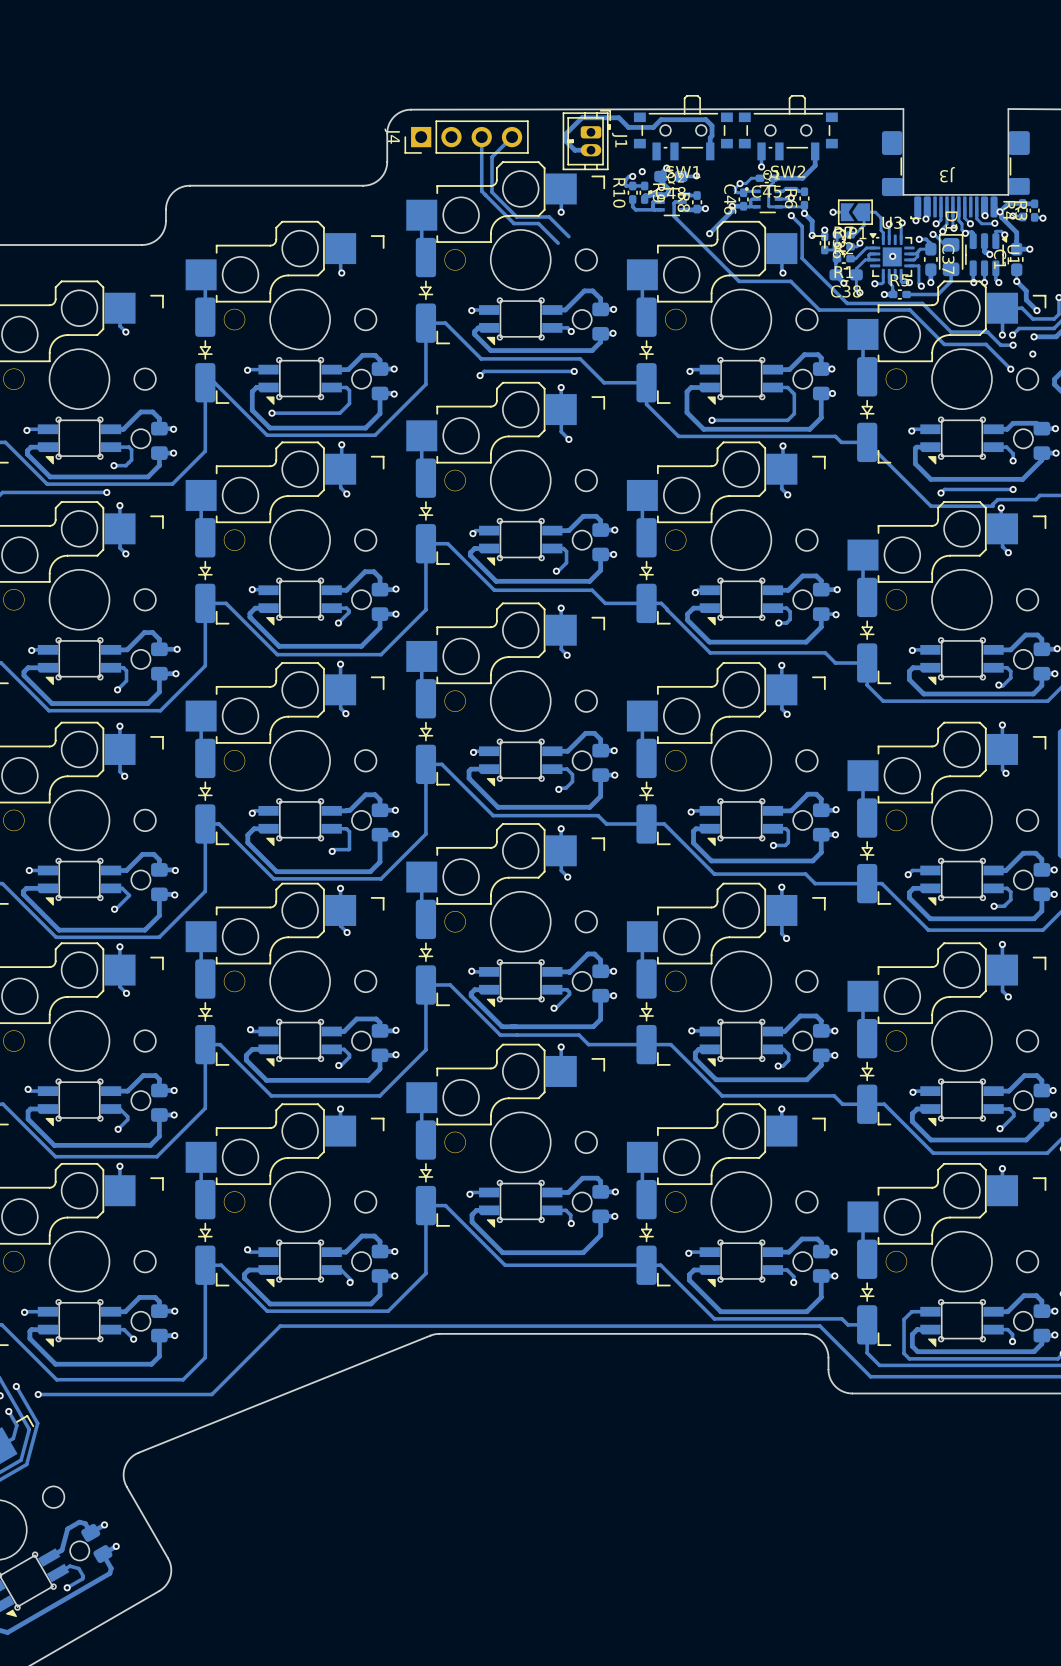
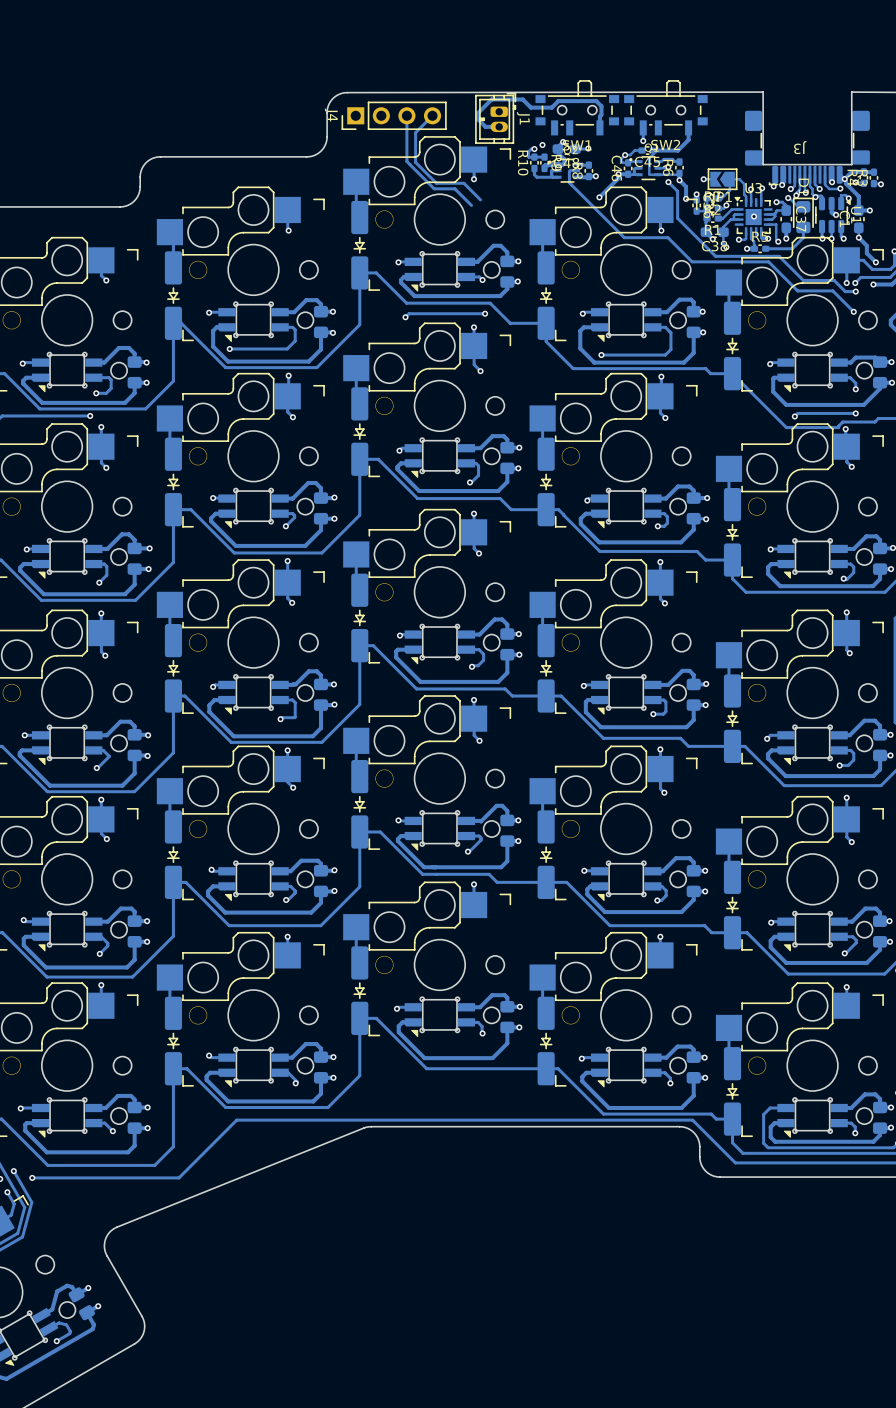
via: (1032, 354) -> none

